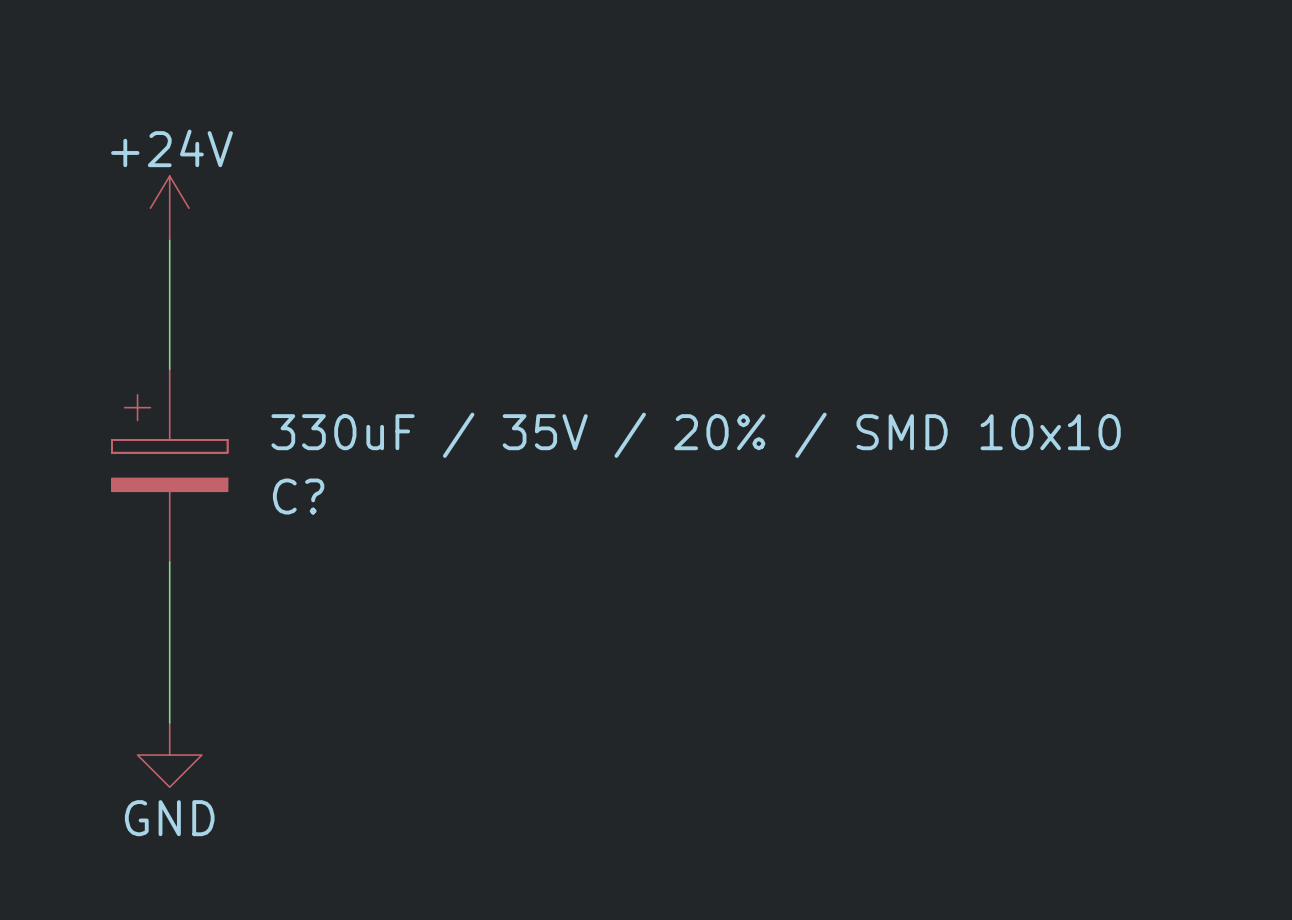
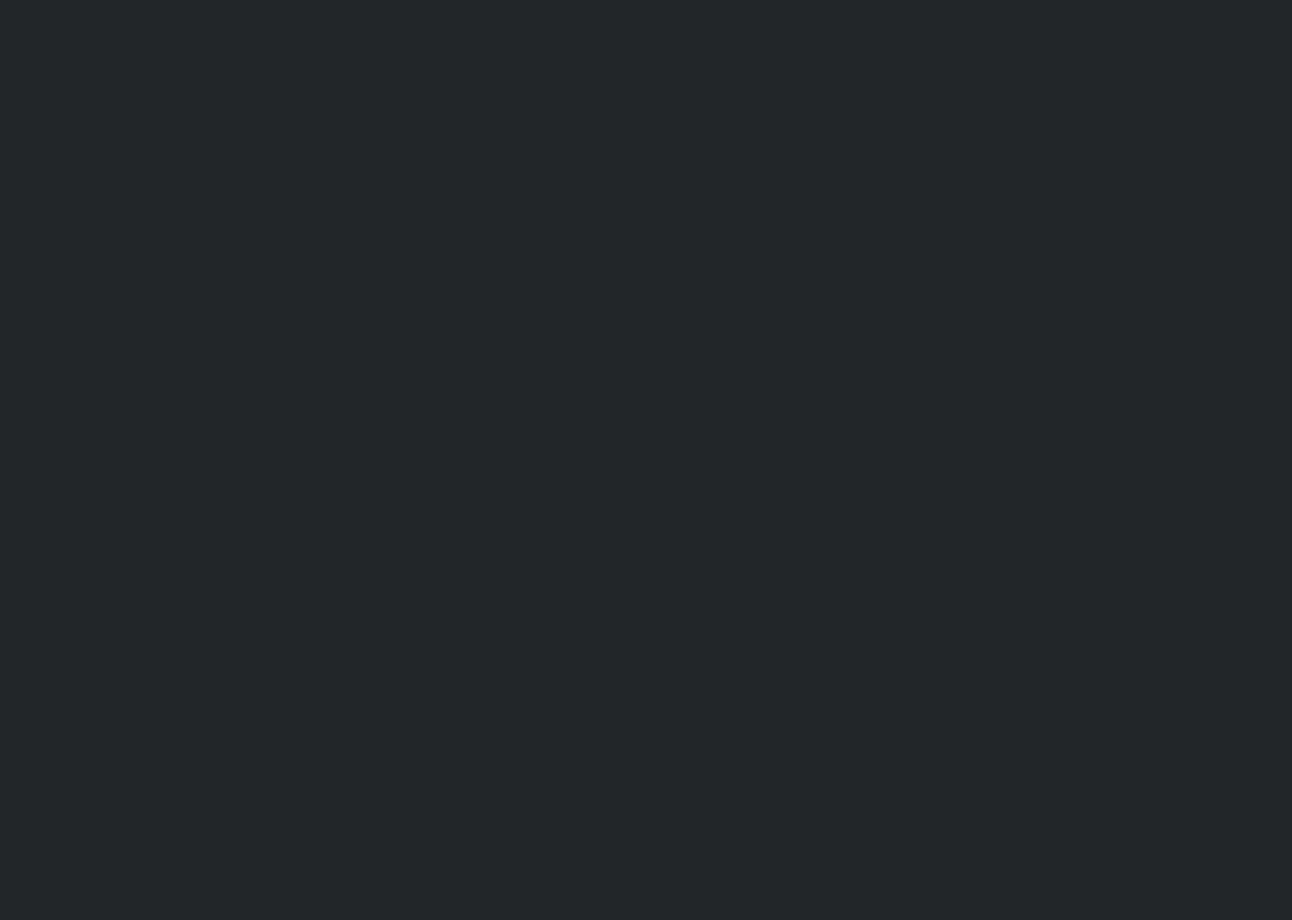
power symbol: +24V (169, 208) -> none
wire: (169, 240) (169, 369) -> none
C?: 330uF / 35V / 20% / SMD 10x10 (169, 465) -> none
wire: (169, 562) (169, 722) -> none
power symbol: GND (169, 755) -> none

